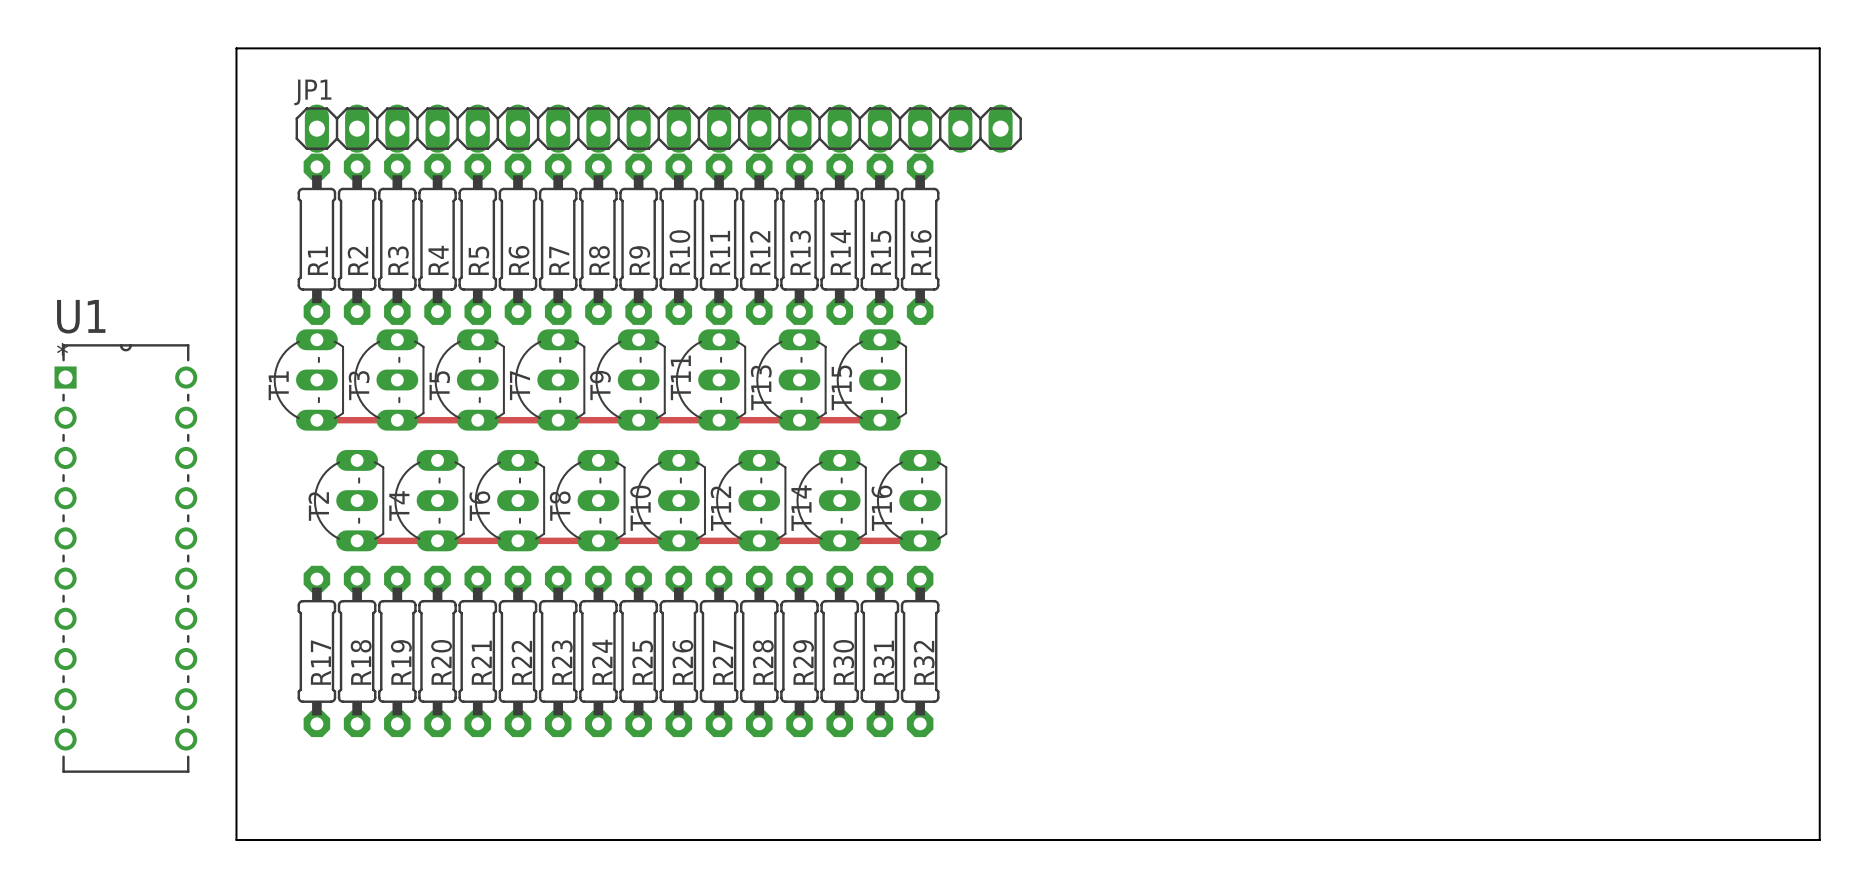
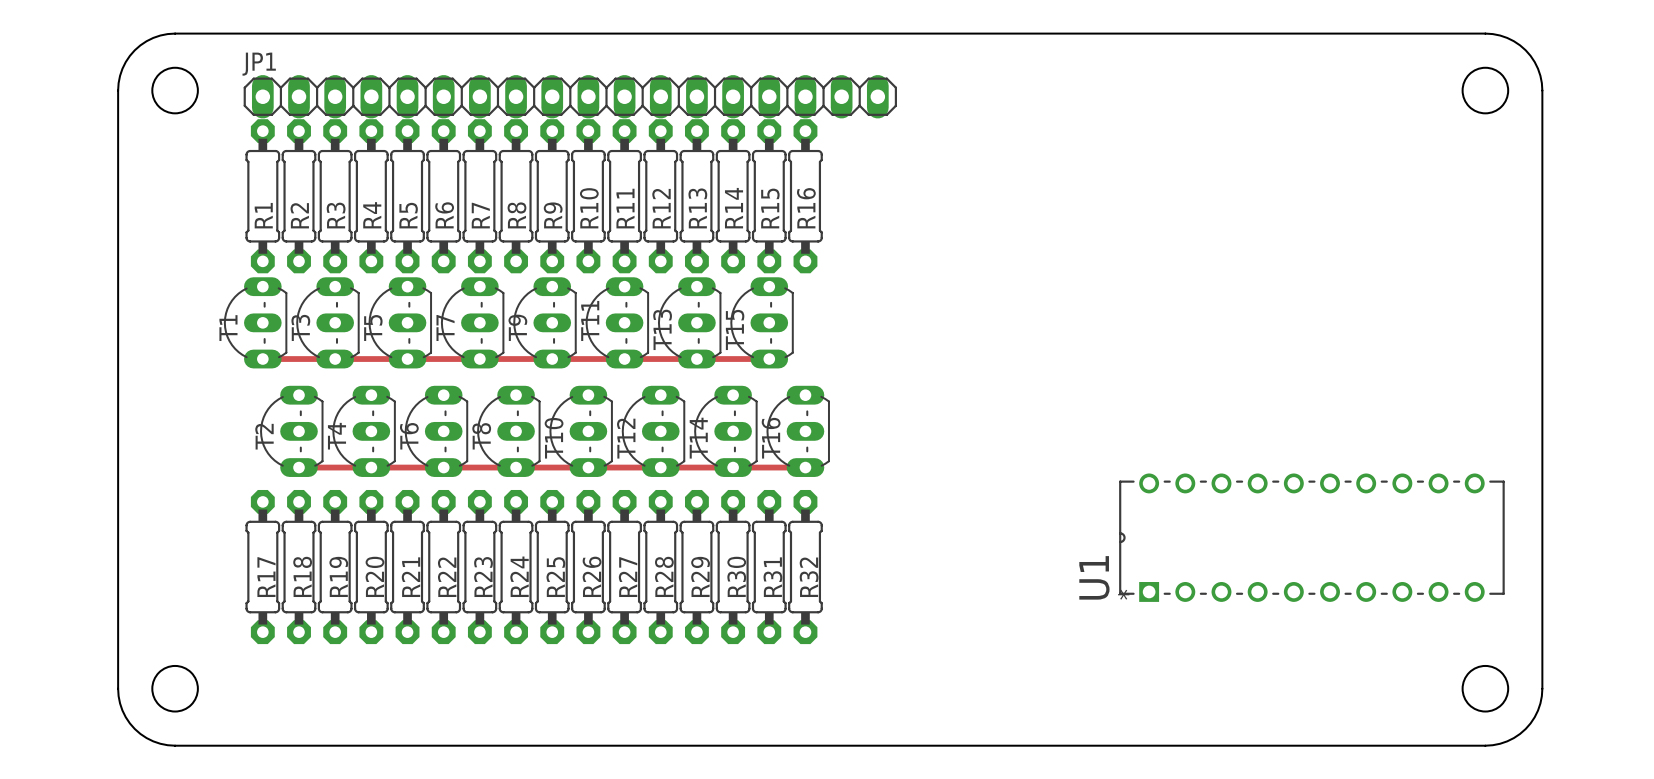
board edge: (236, 48) (1819, 48) (1819, 840) (236, 840) (236, 48) -> none
part: none -> (830, 389)
U1 rotation: 0° (125, 558) -> 90° counterclockwise (1311, 537)
U1 position: (125, 558) -> (1311, 537)

